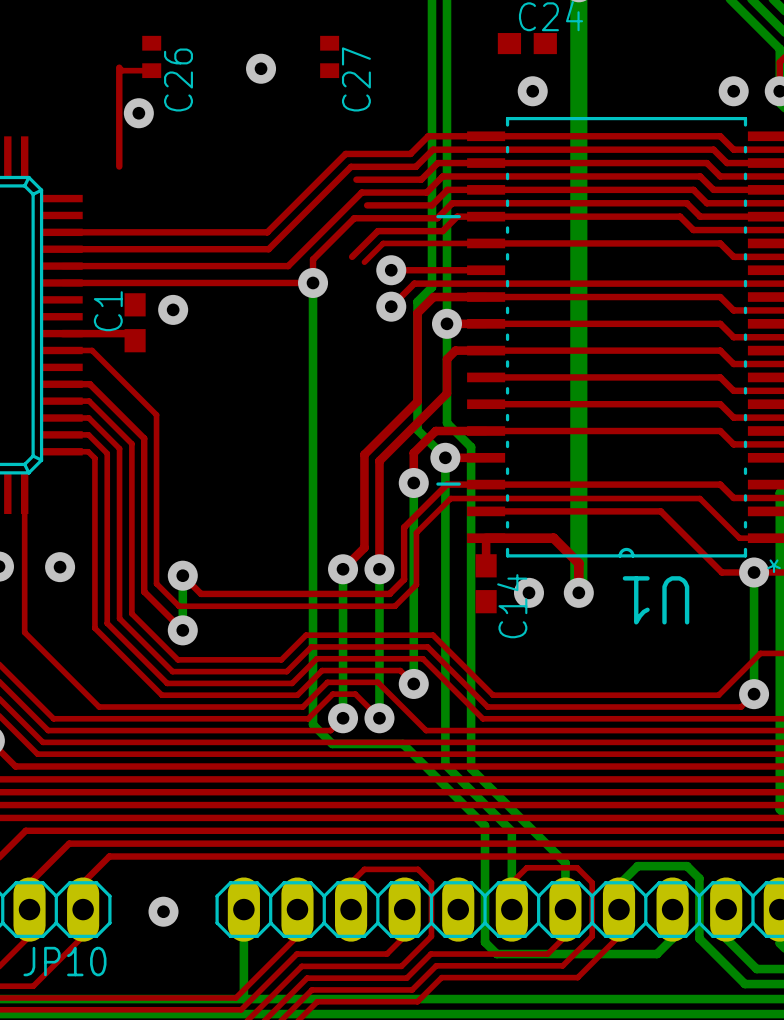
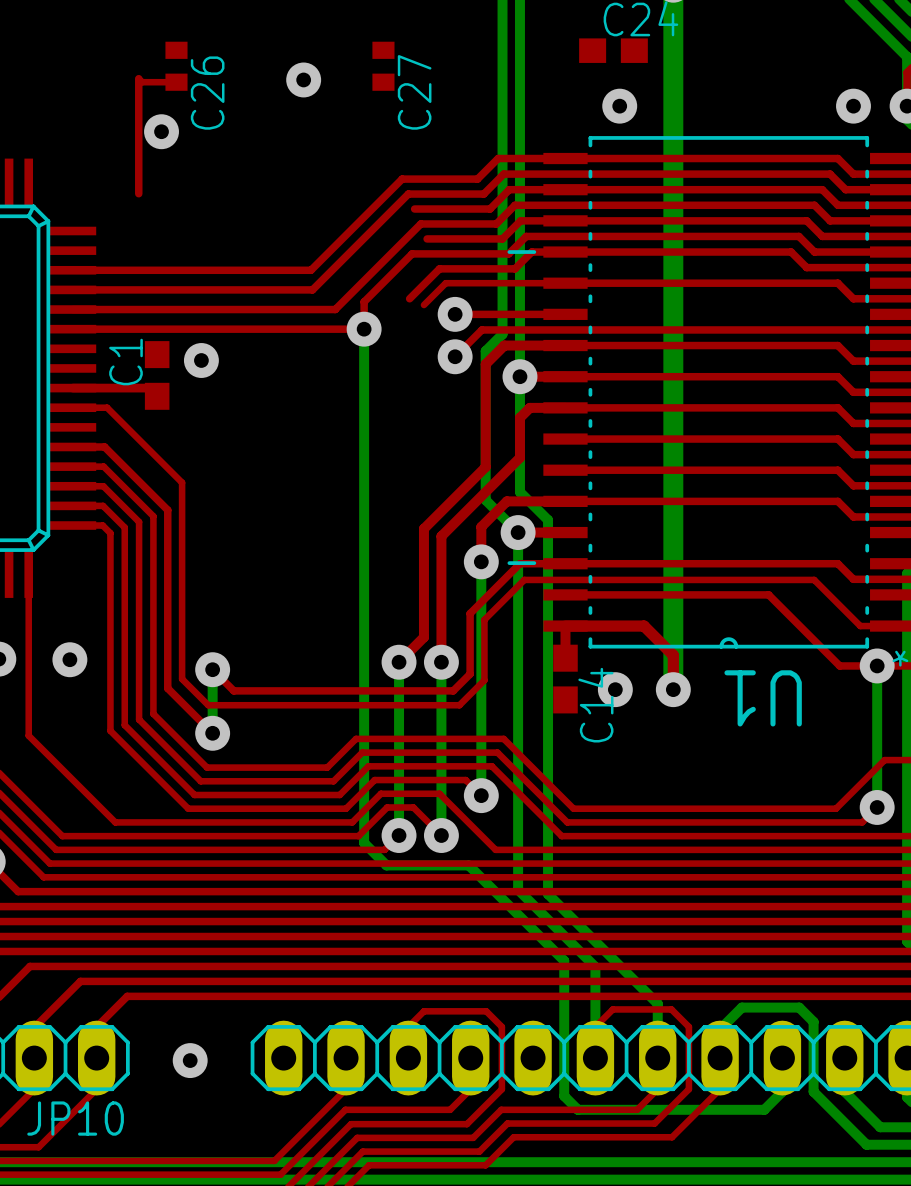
bottom track: (243, 909) (243, 999) -> none

